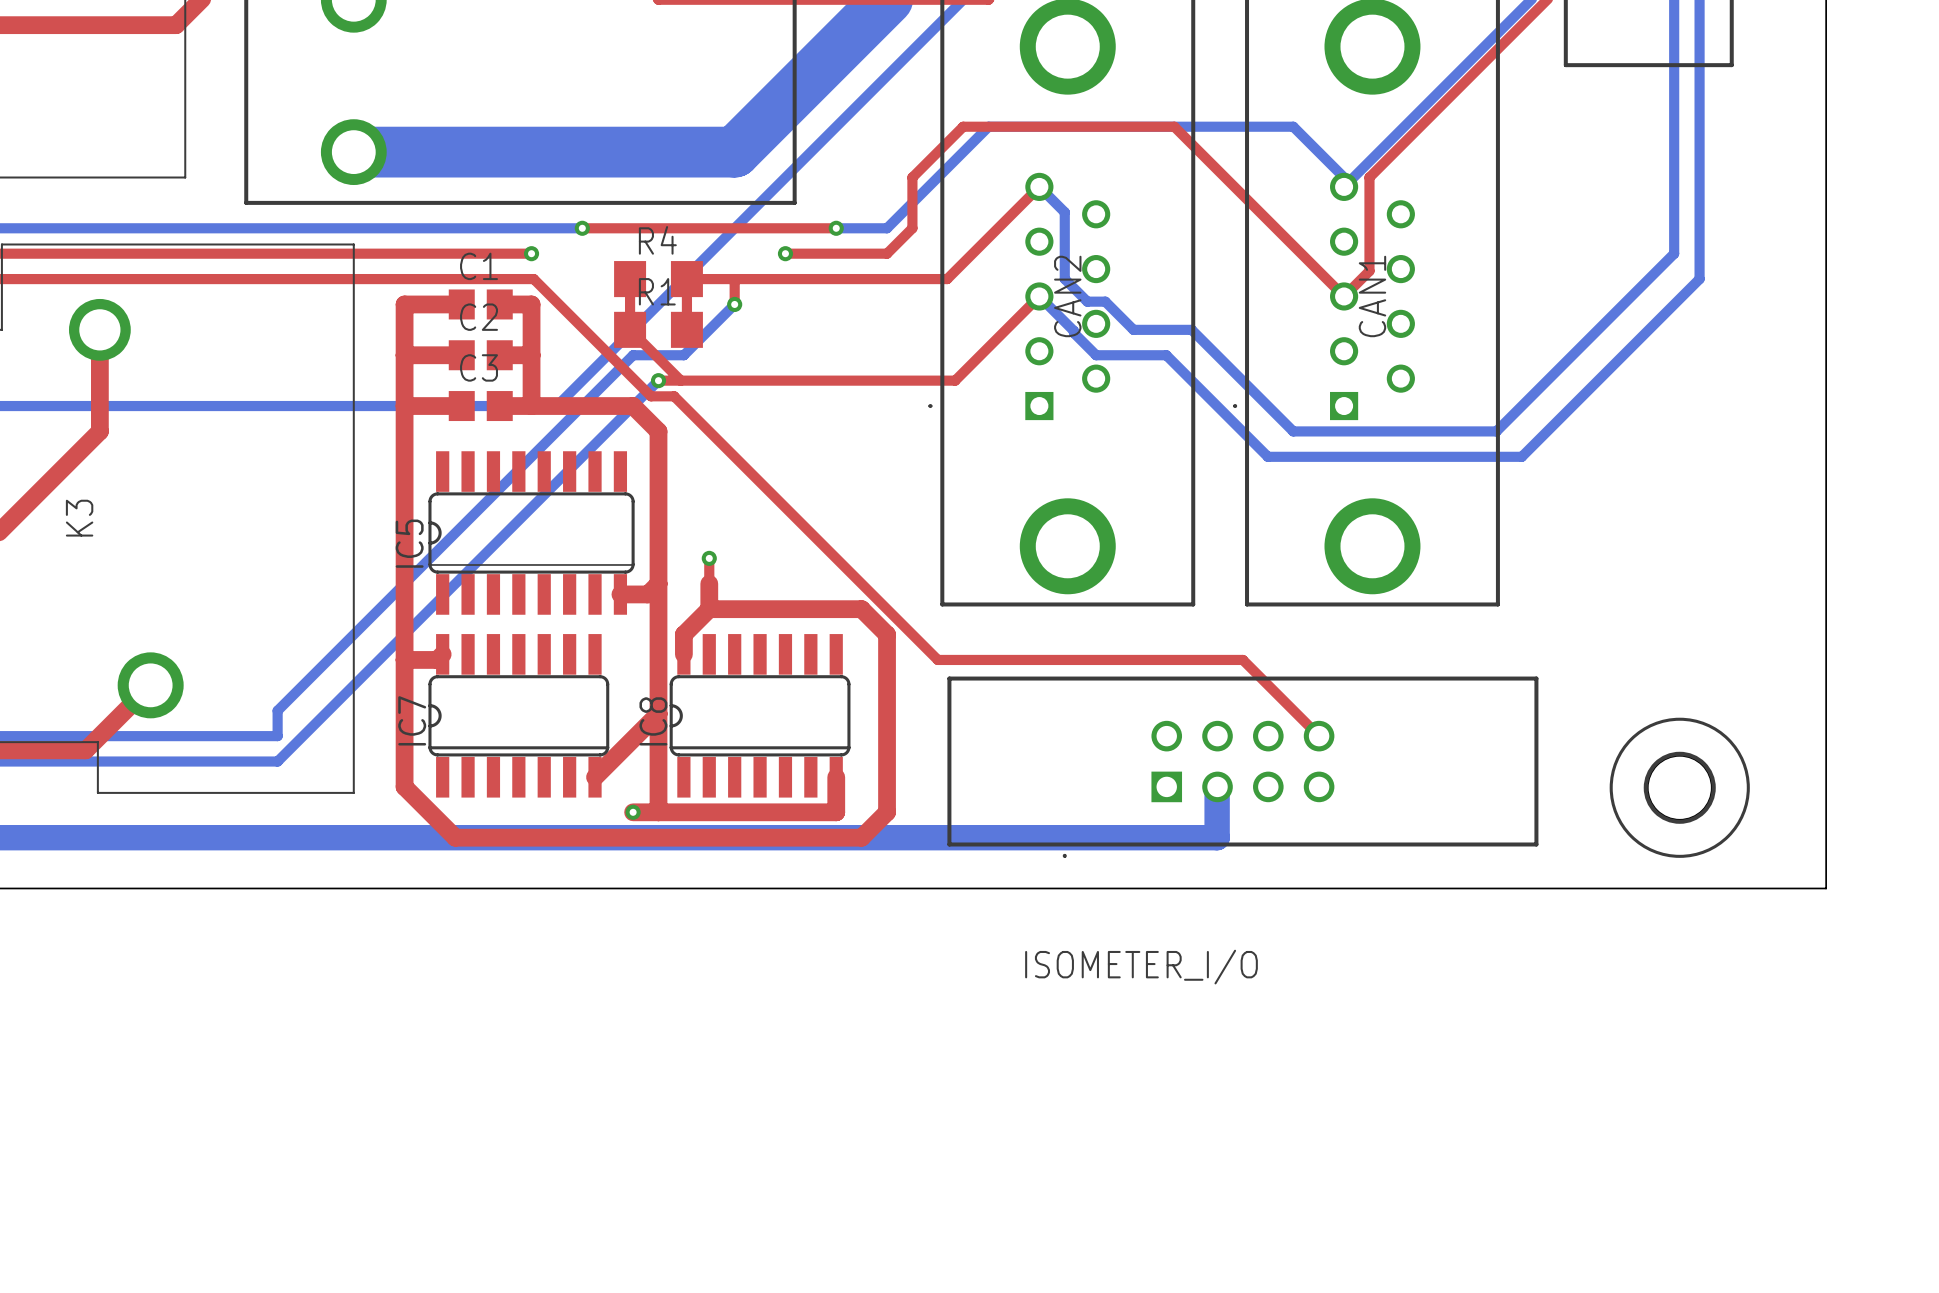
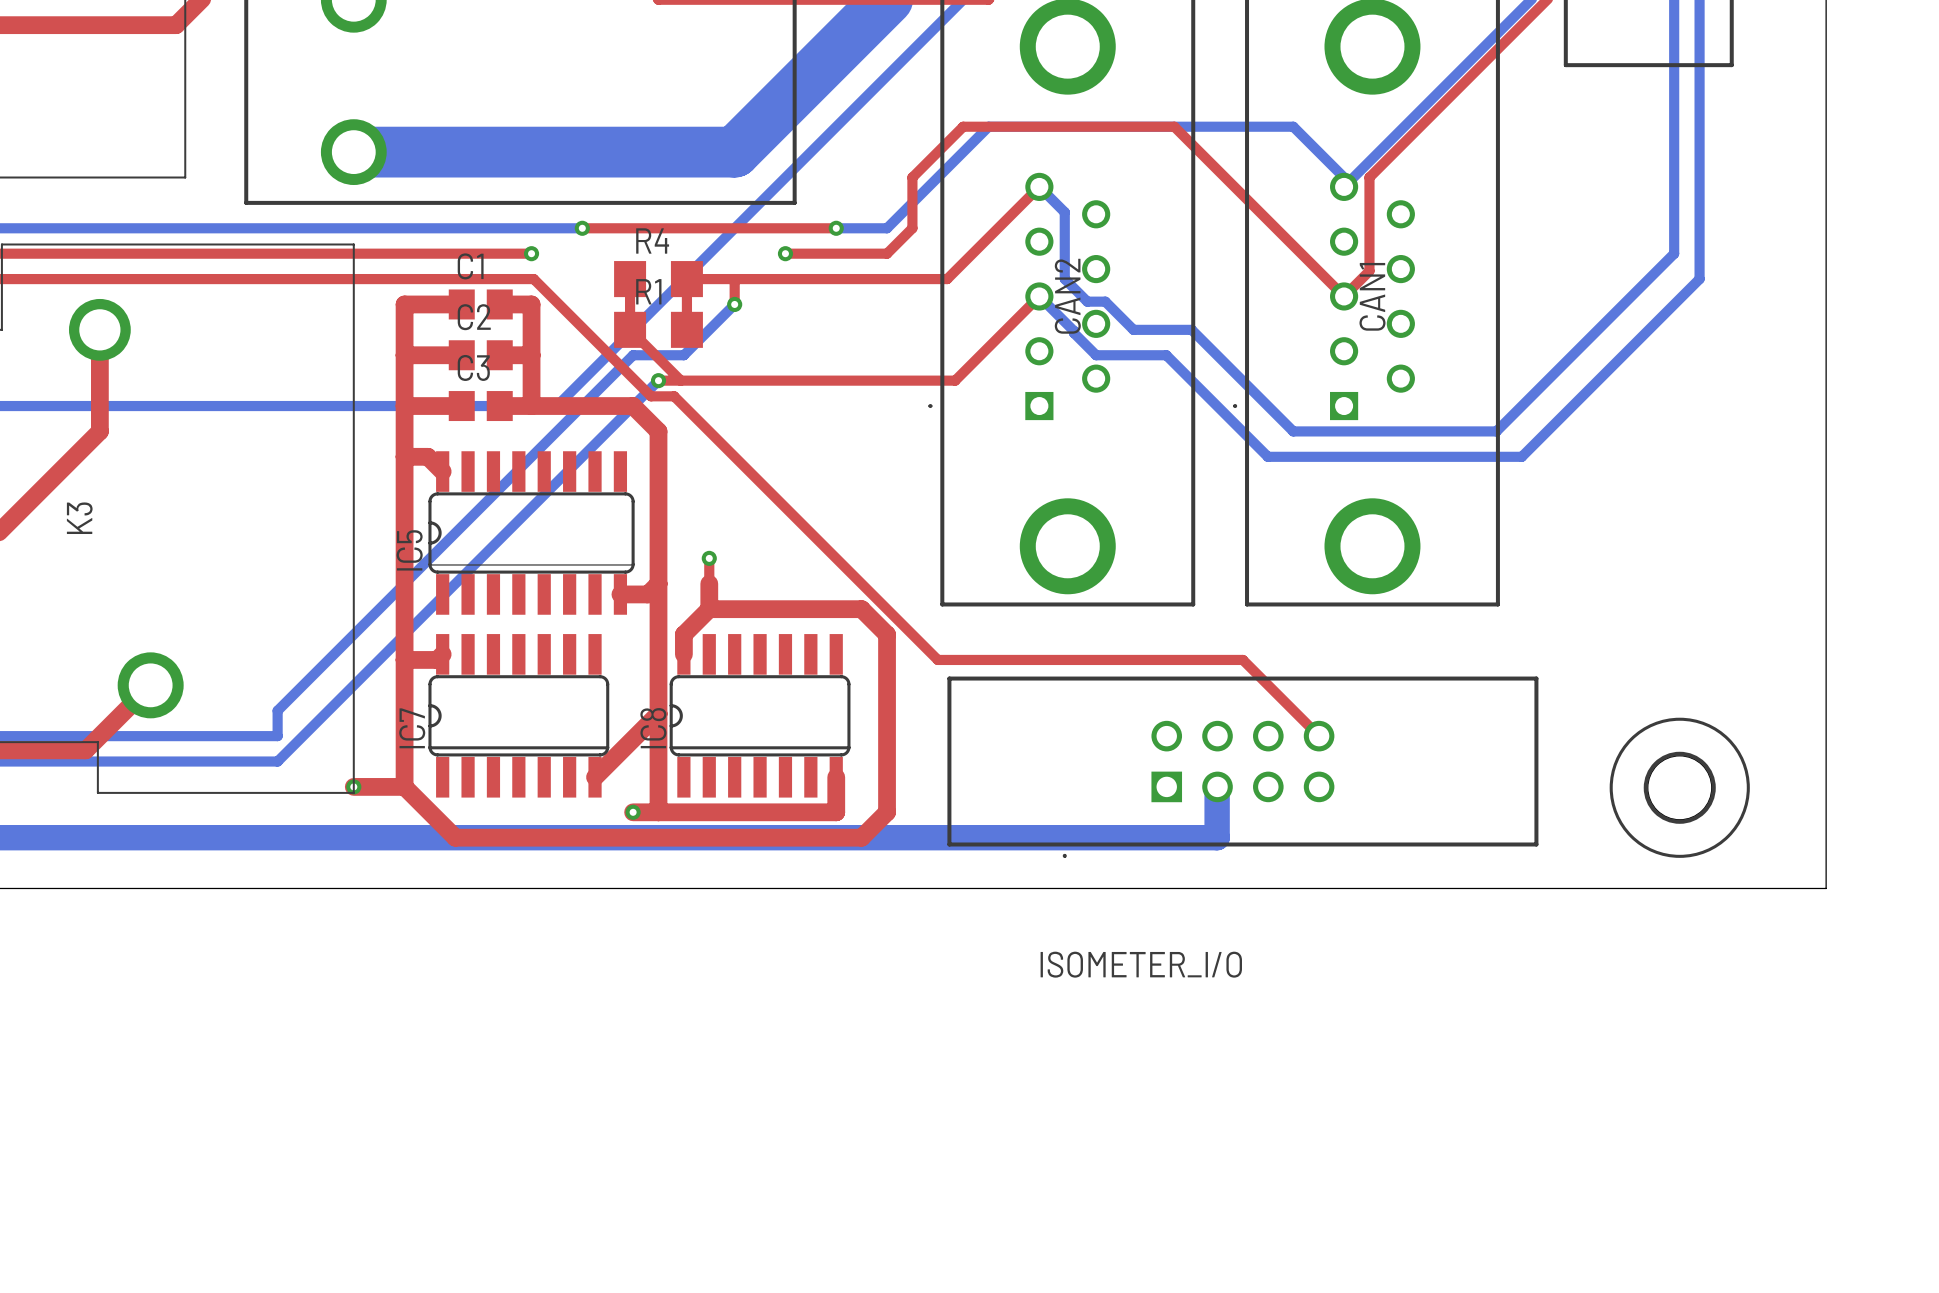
top track: none -> (404, 456) (427, 456) (442, 471)
top track: none -> (353, 786) (404, 786)
via: none -> (353, 786)

